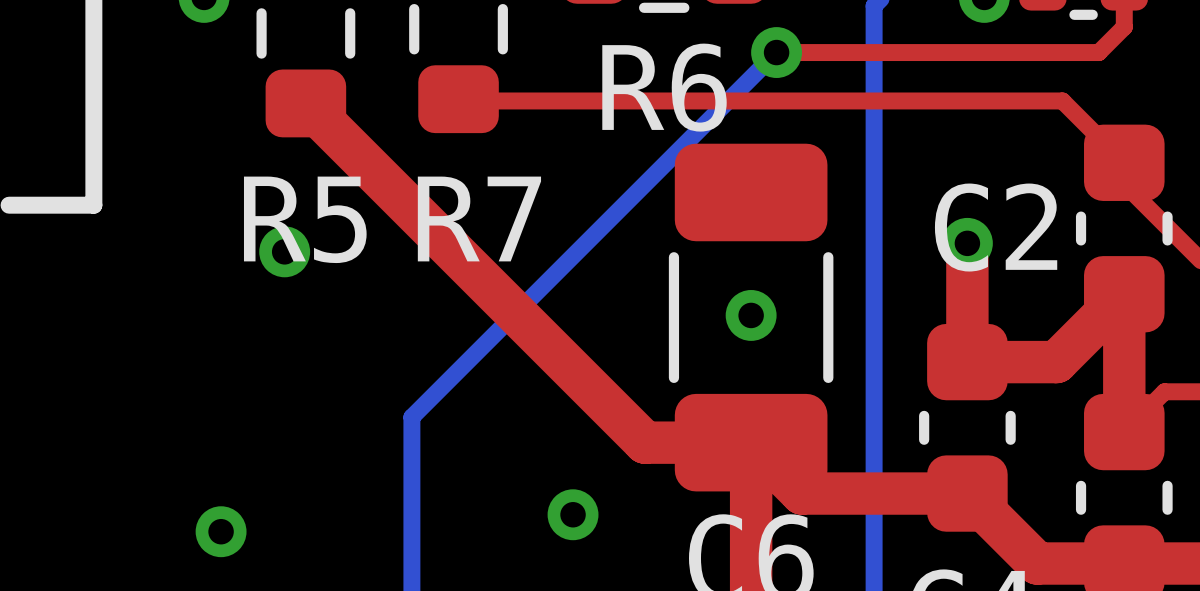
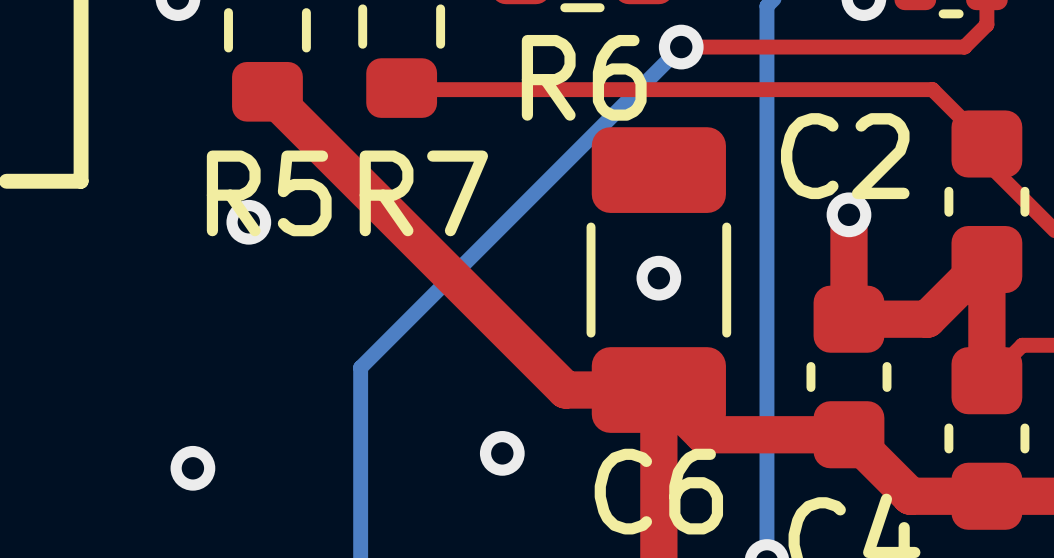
C2 name position: C2 (996, 227) -> C2 (845, 156)

